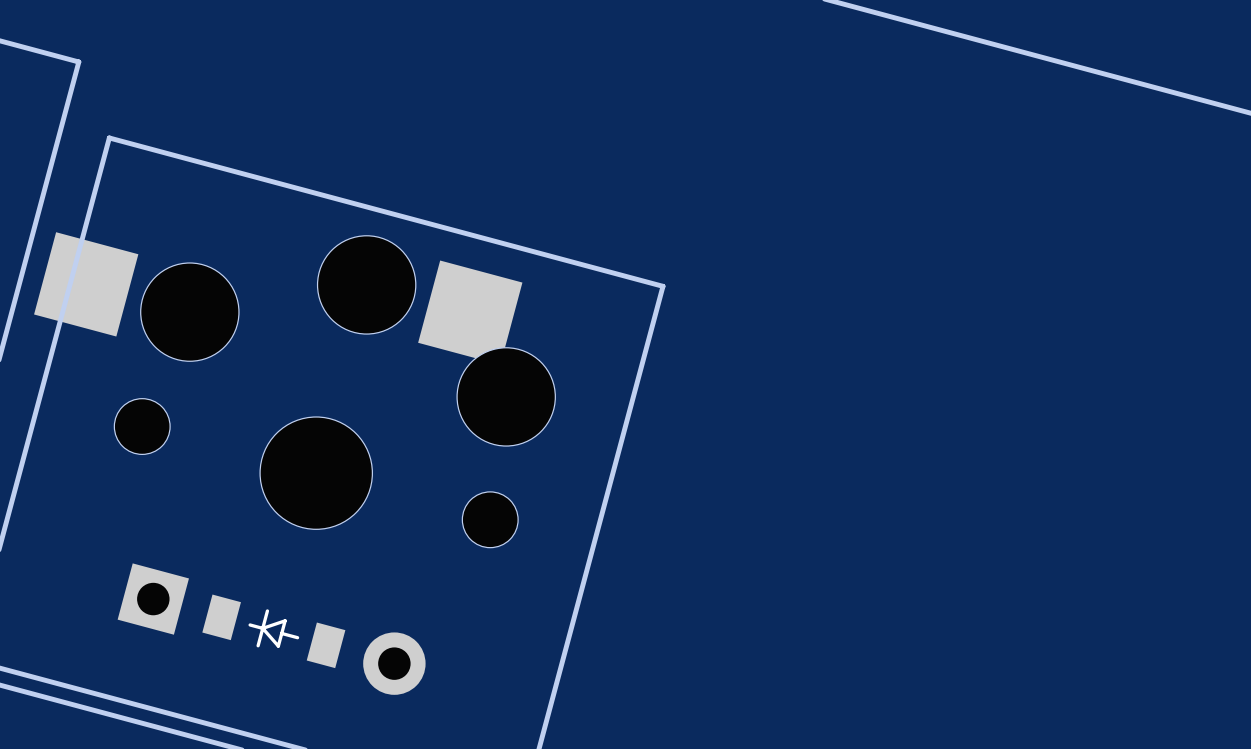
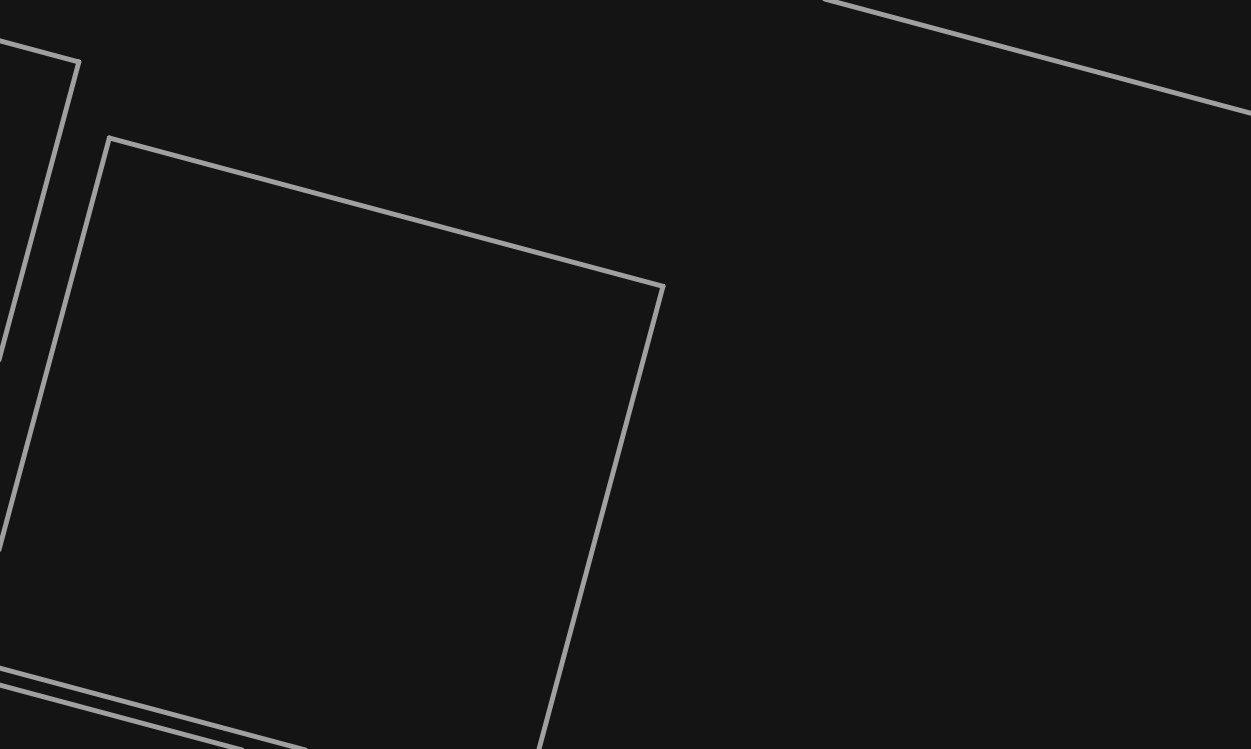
part: (294, 389) -> none
part: (271, 629) -> none

